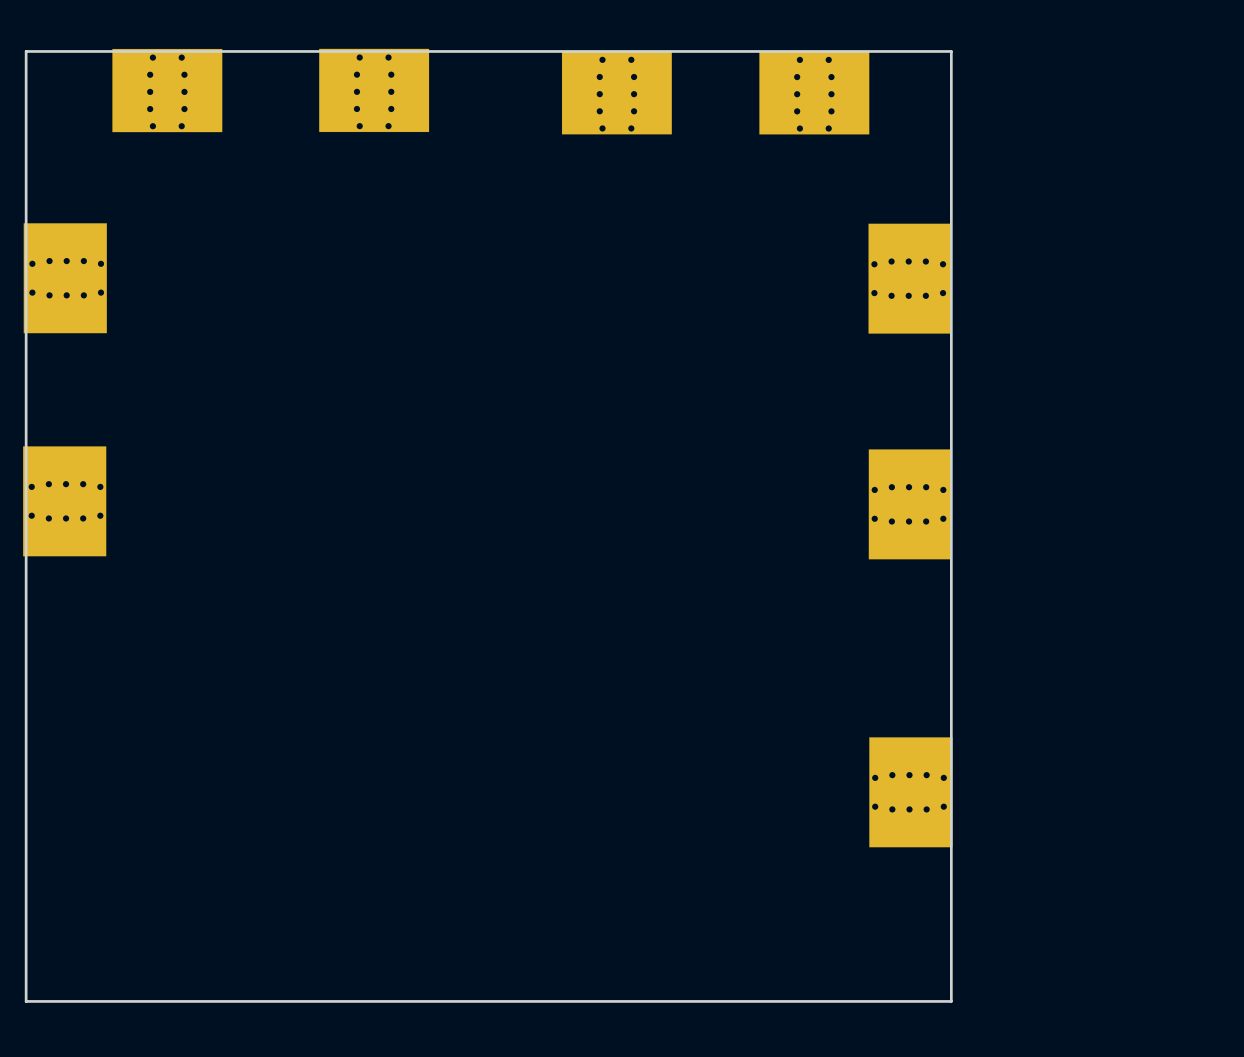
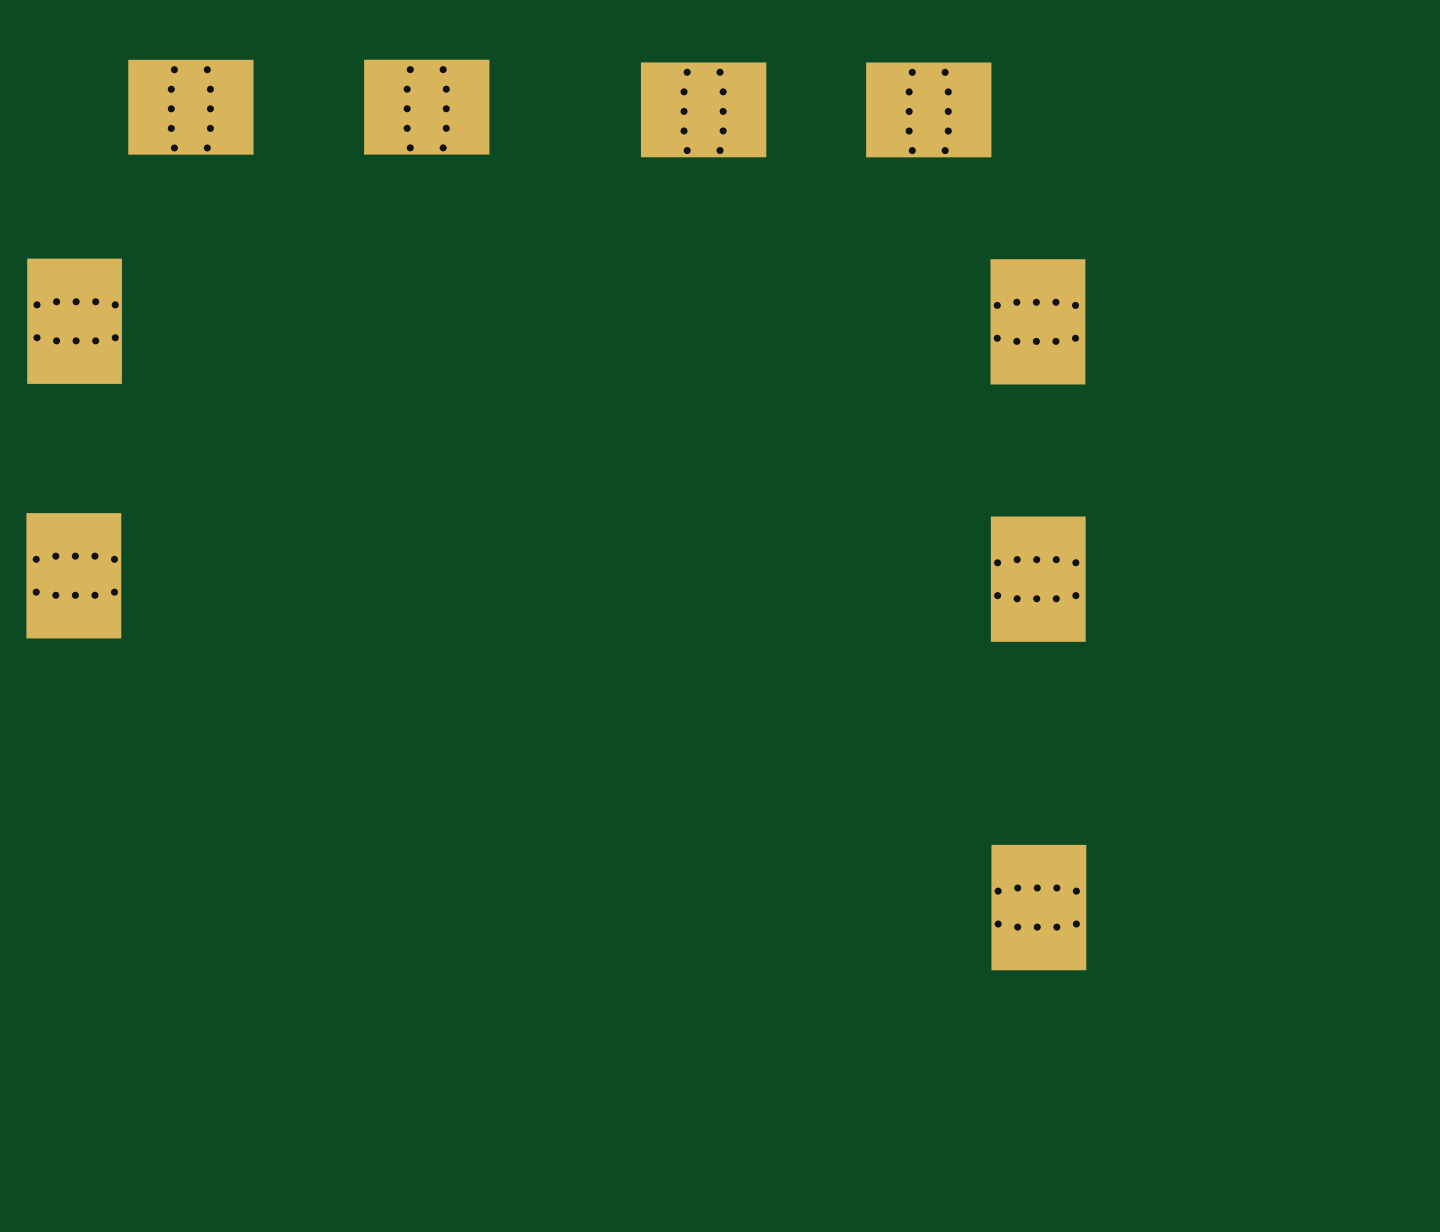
board edge: (951, 51) (26, 51) (26, 1001) (951, 1001) (951, 51) -> none

